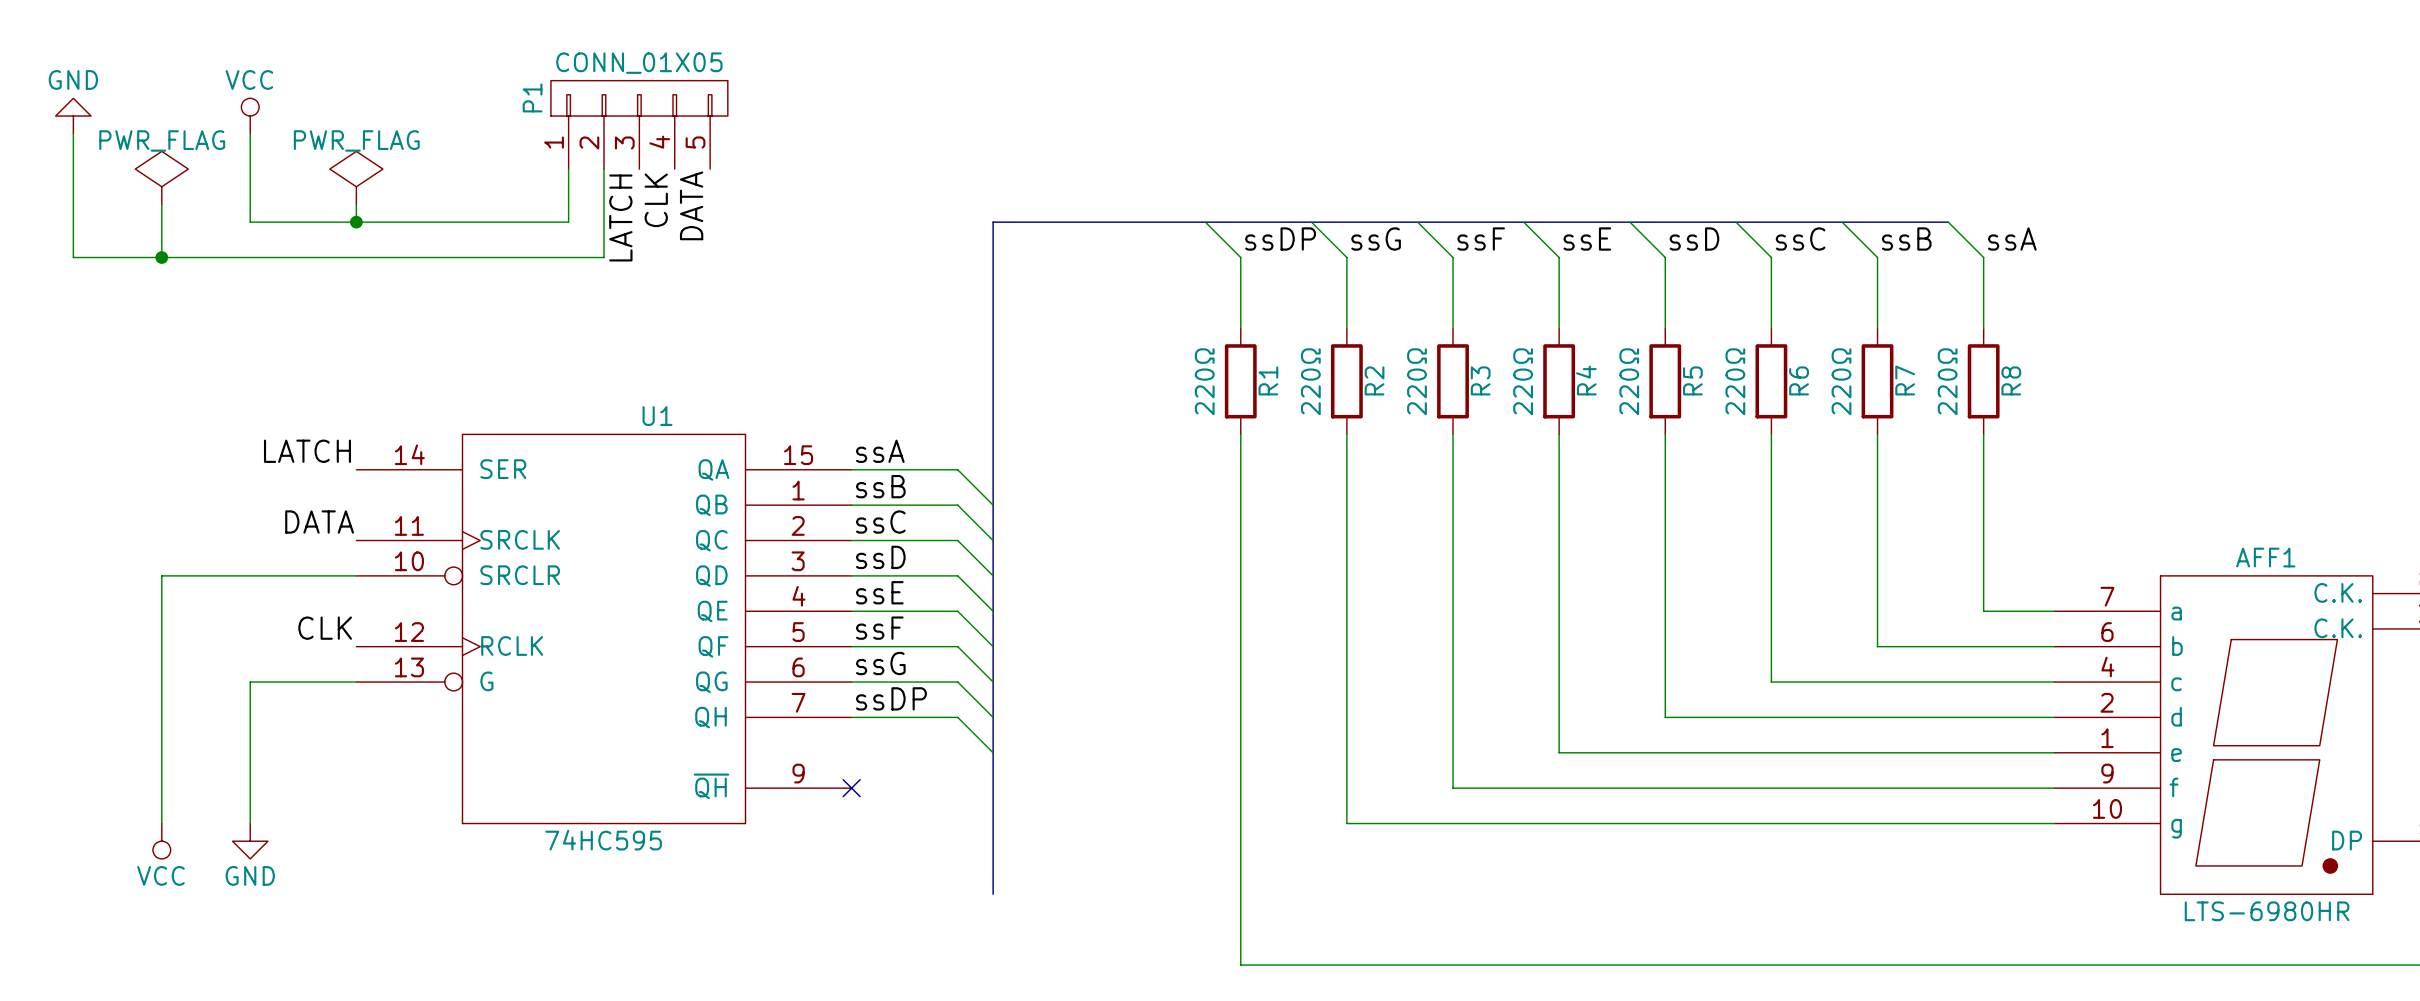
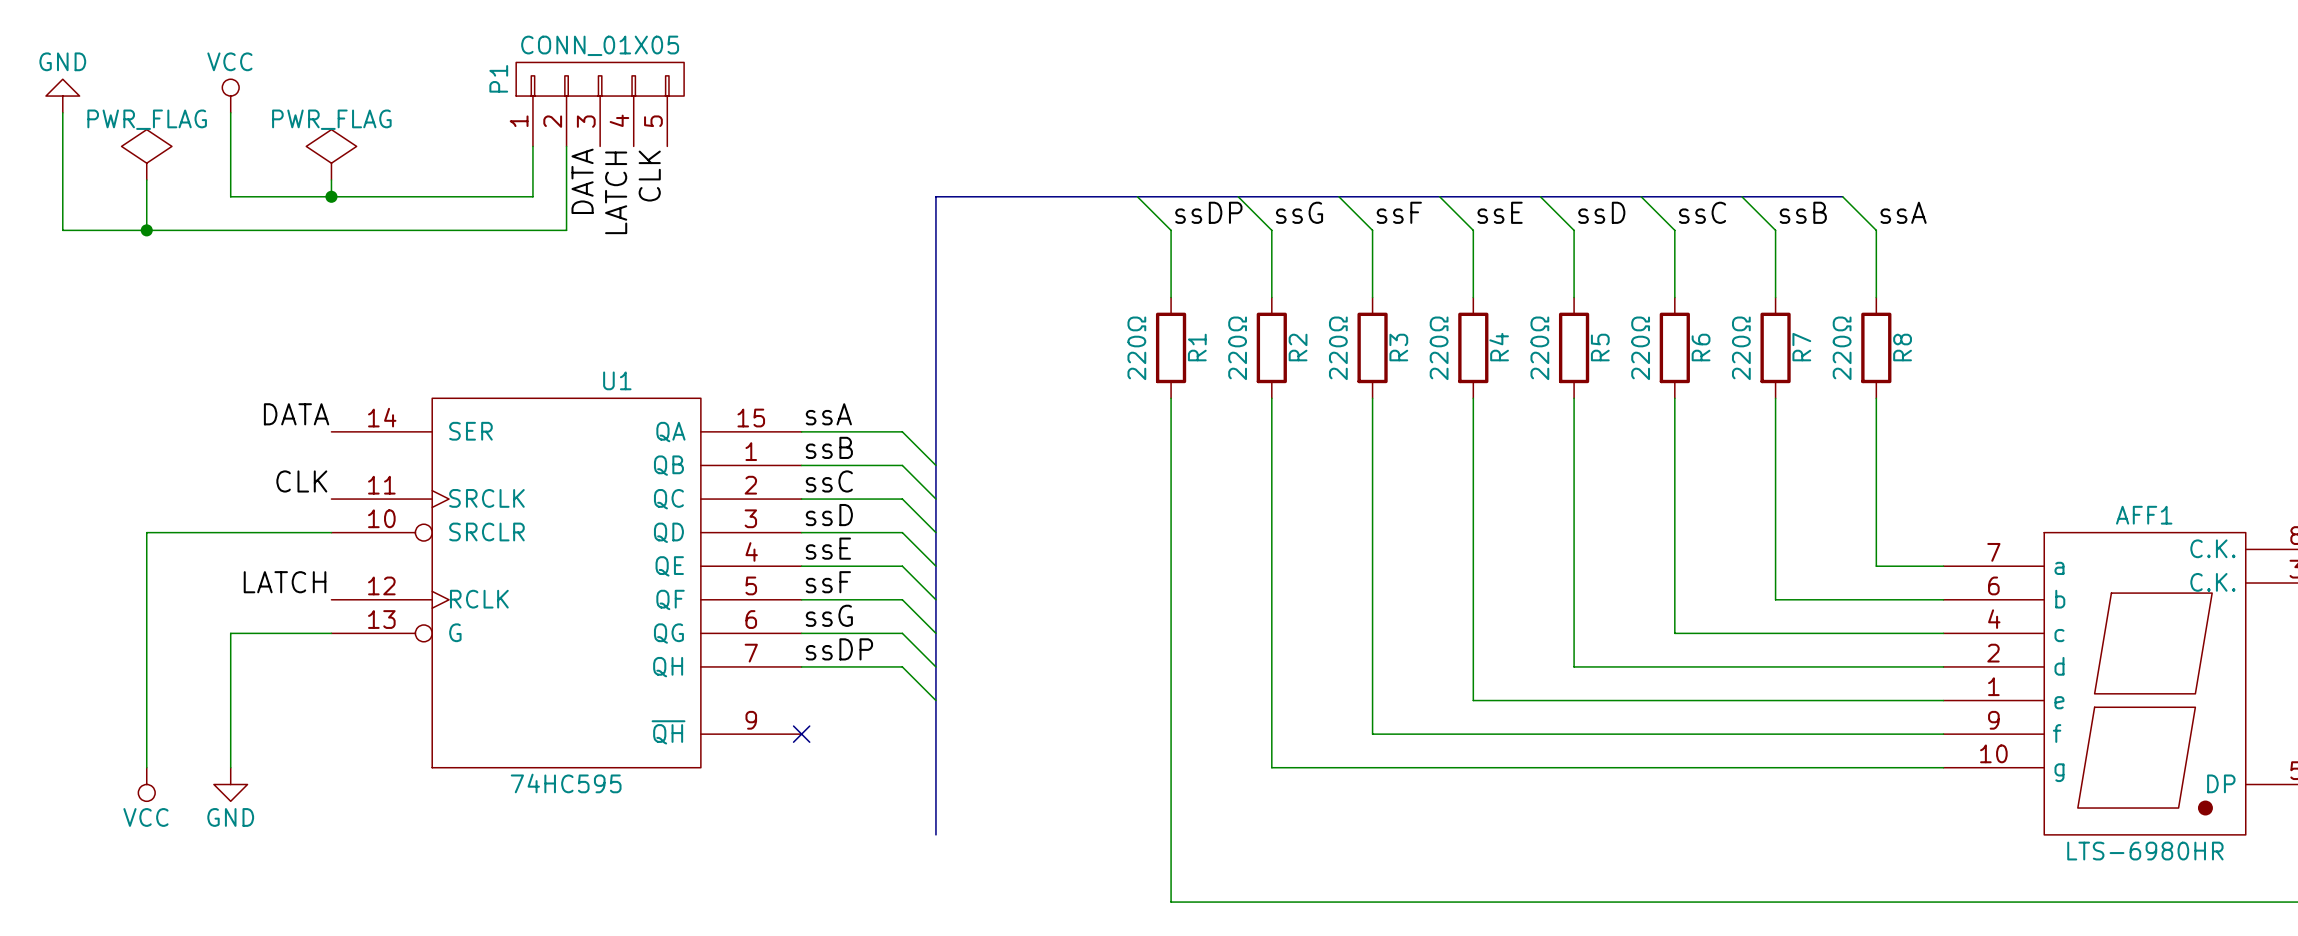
label: CLK (656, 200) -> LATCH (616, 192)
label: DATA (691, 205) -> CLK (649, 176)
label: LATCH (620, 217) -> DATA (582, 181)
label: LATCH (307, 451) -> DATA (296, 414)
label: DATA (319, 522) -> CLK (301, 481)
label: CLK (325, 628) -> LATCH (285, 582)

